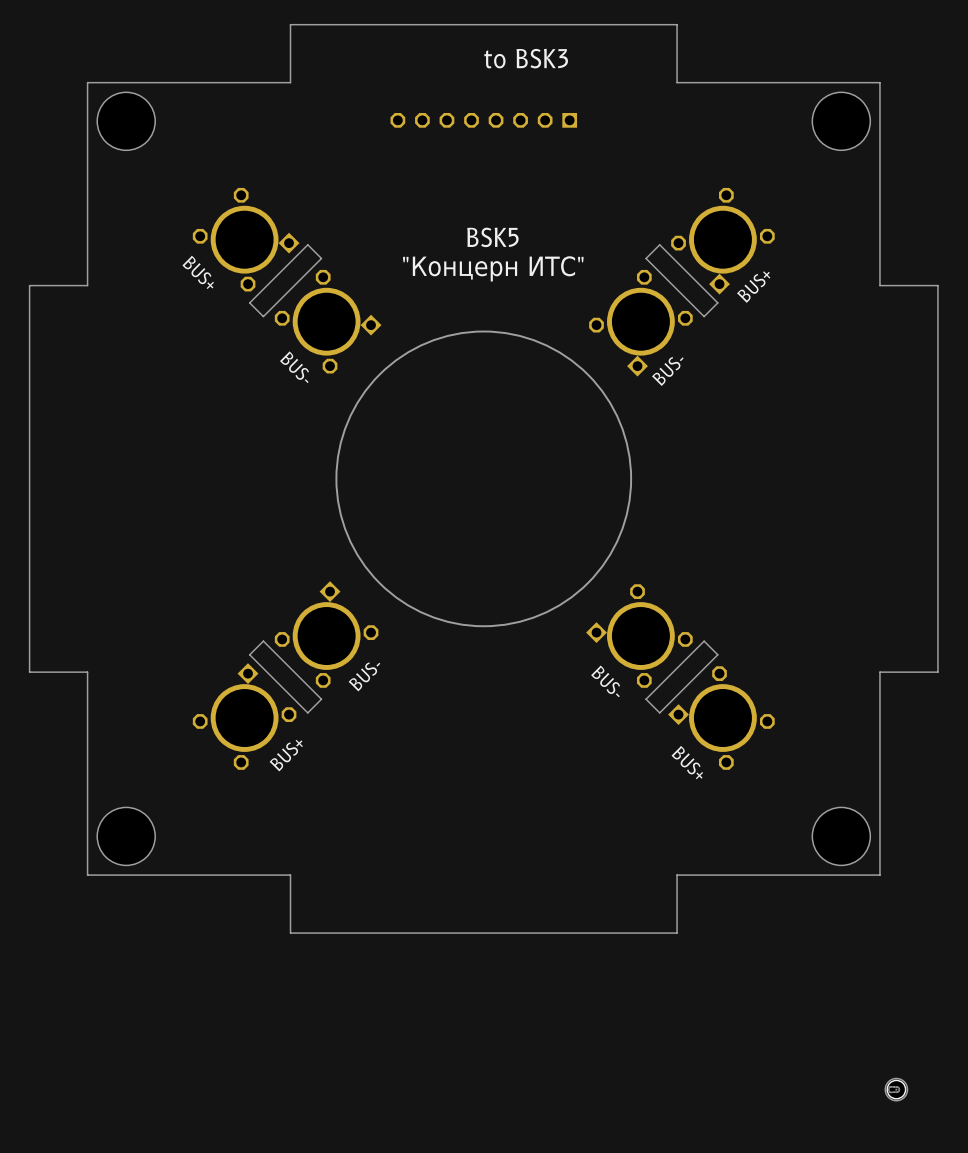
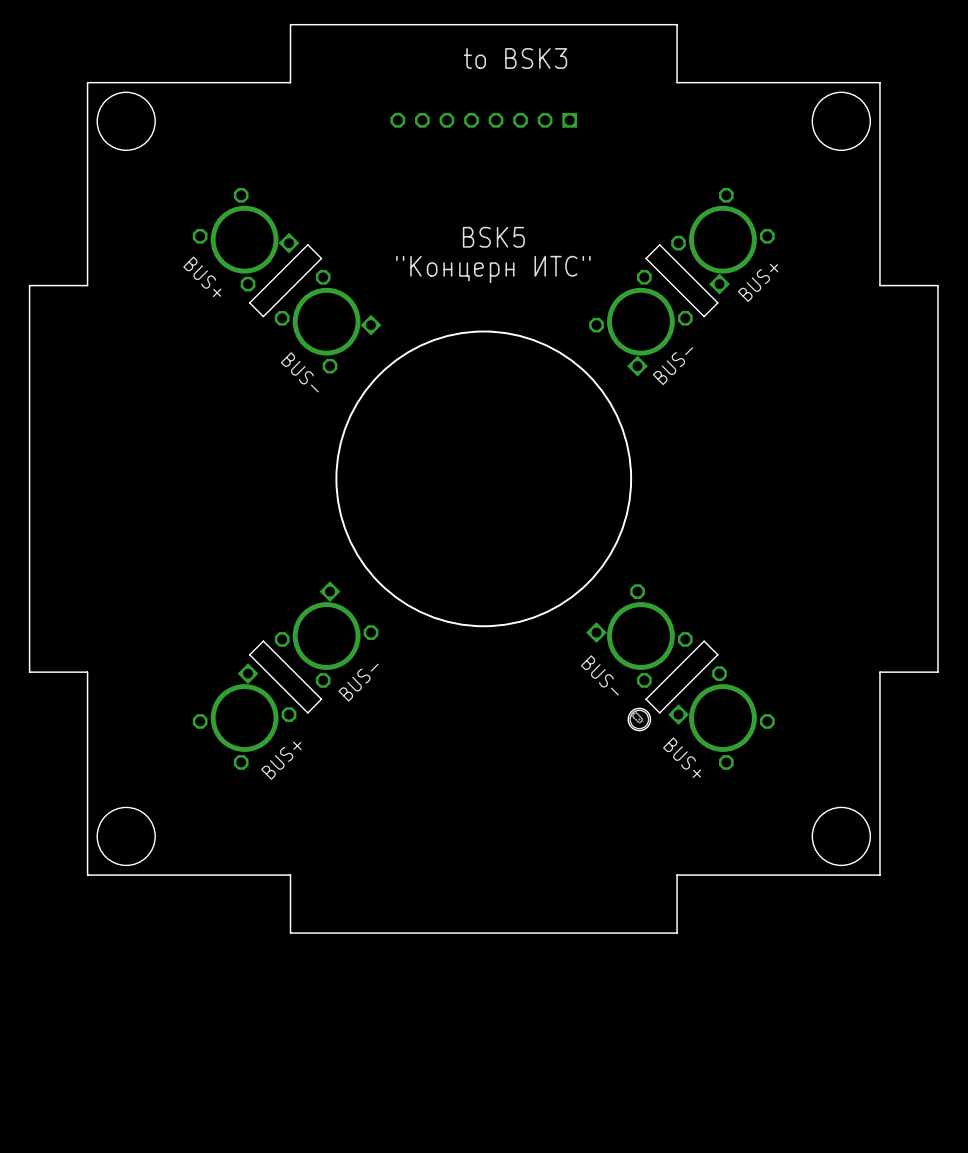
part: none -> (639, 719)
part: (896, 1089) -> none

